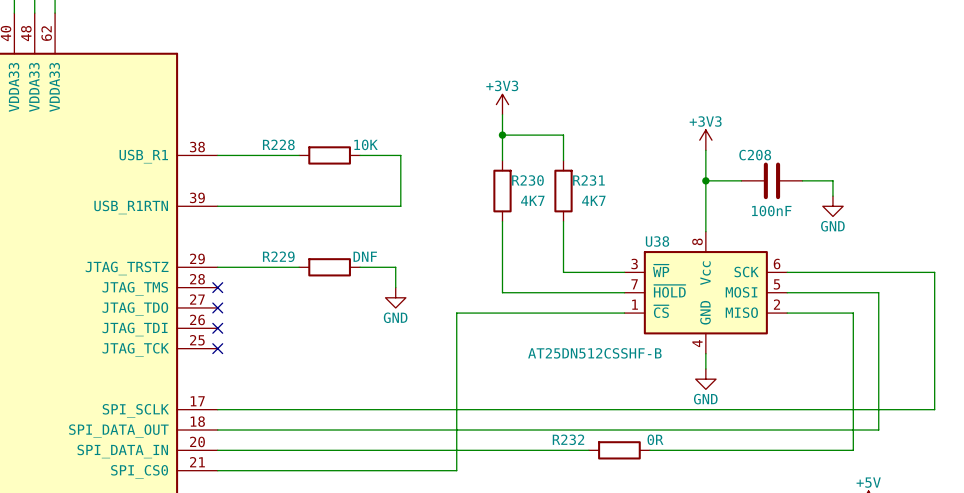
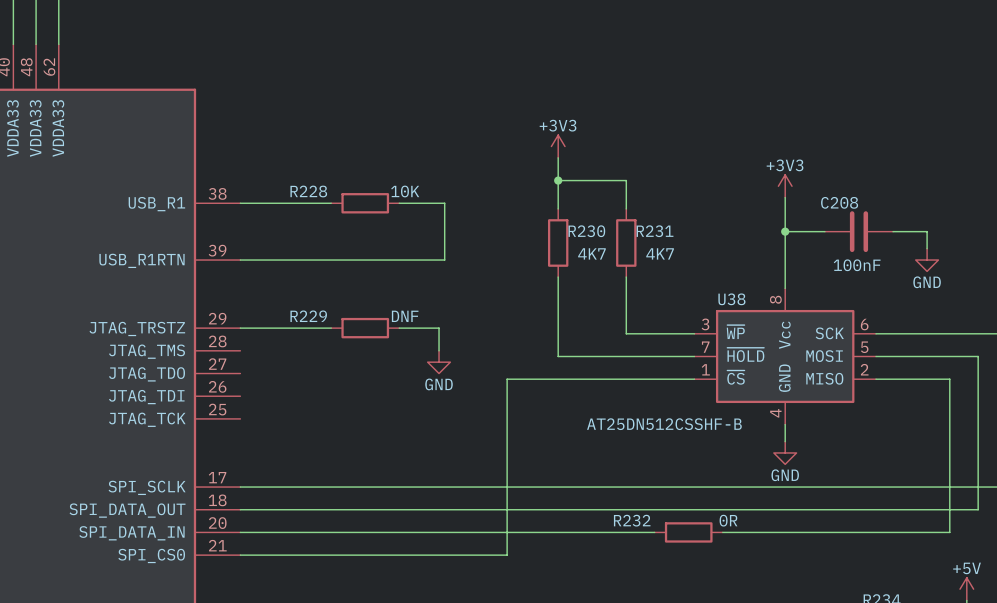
no-connect mark: (217, 287) -> none
no-connect mark: (217, 307) -> none
no-connect mark: (217, 328) -> none
no-connect mark: (217, 348) -> none

